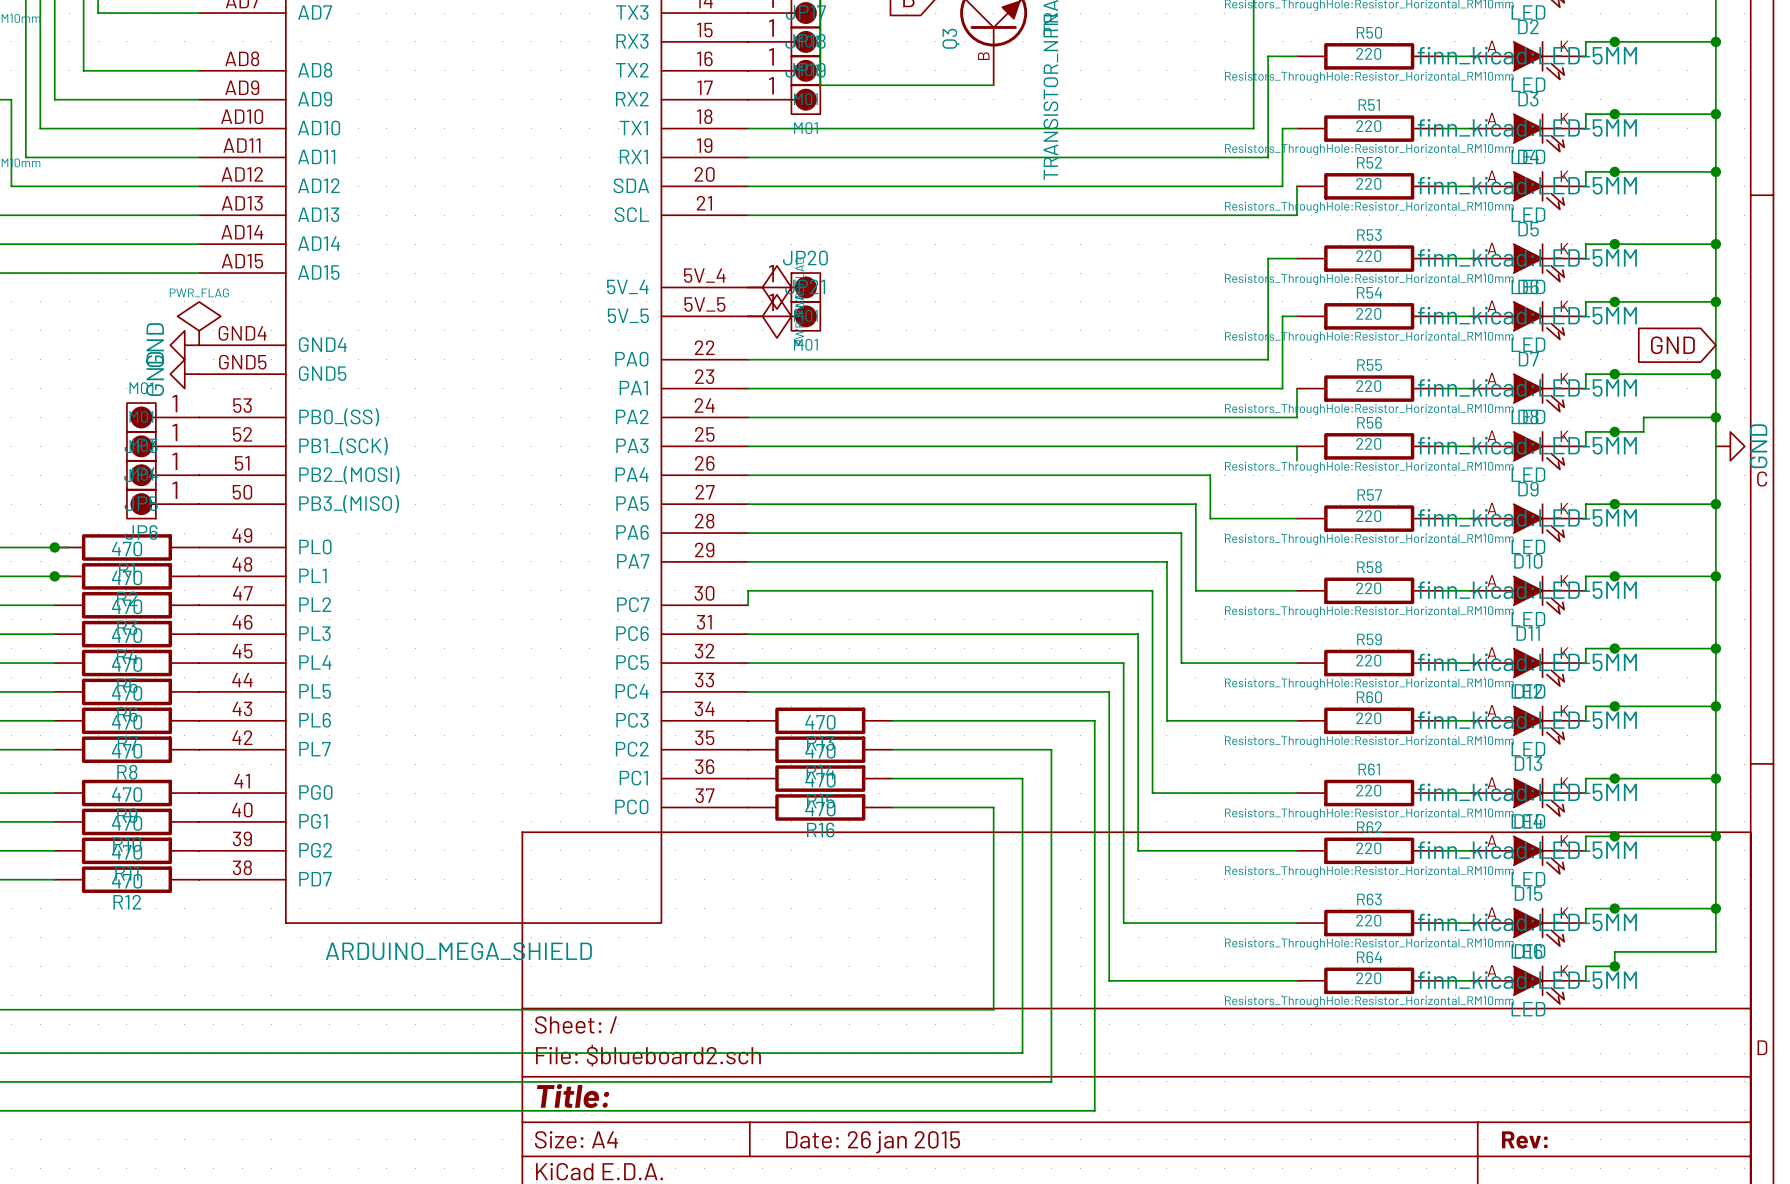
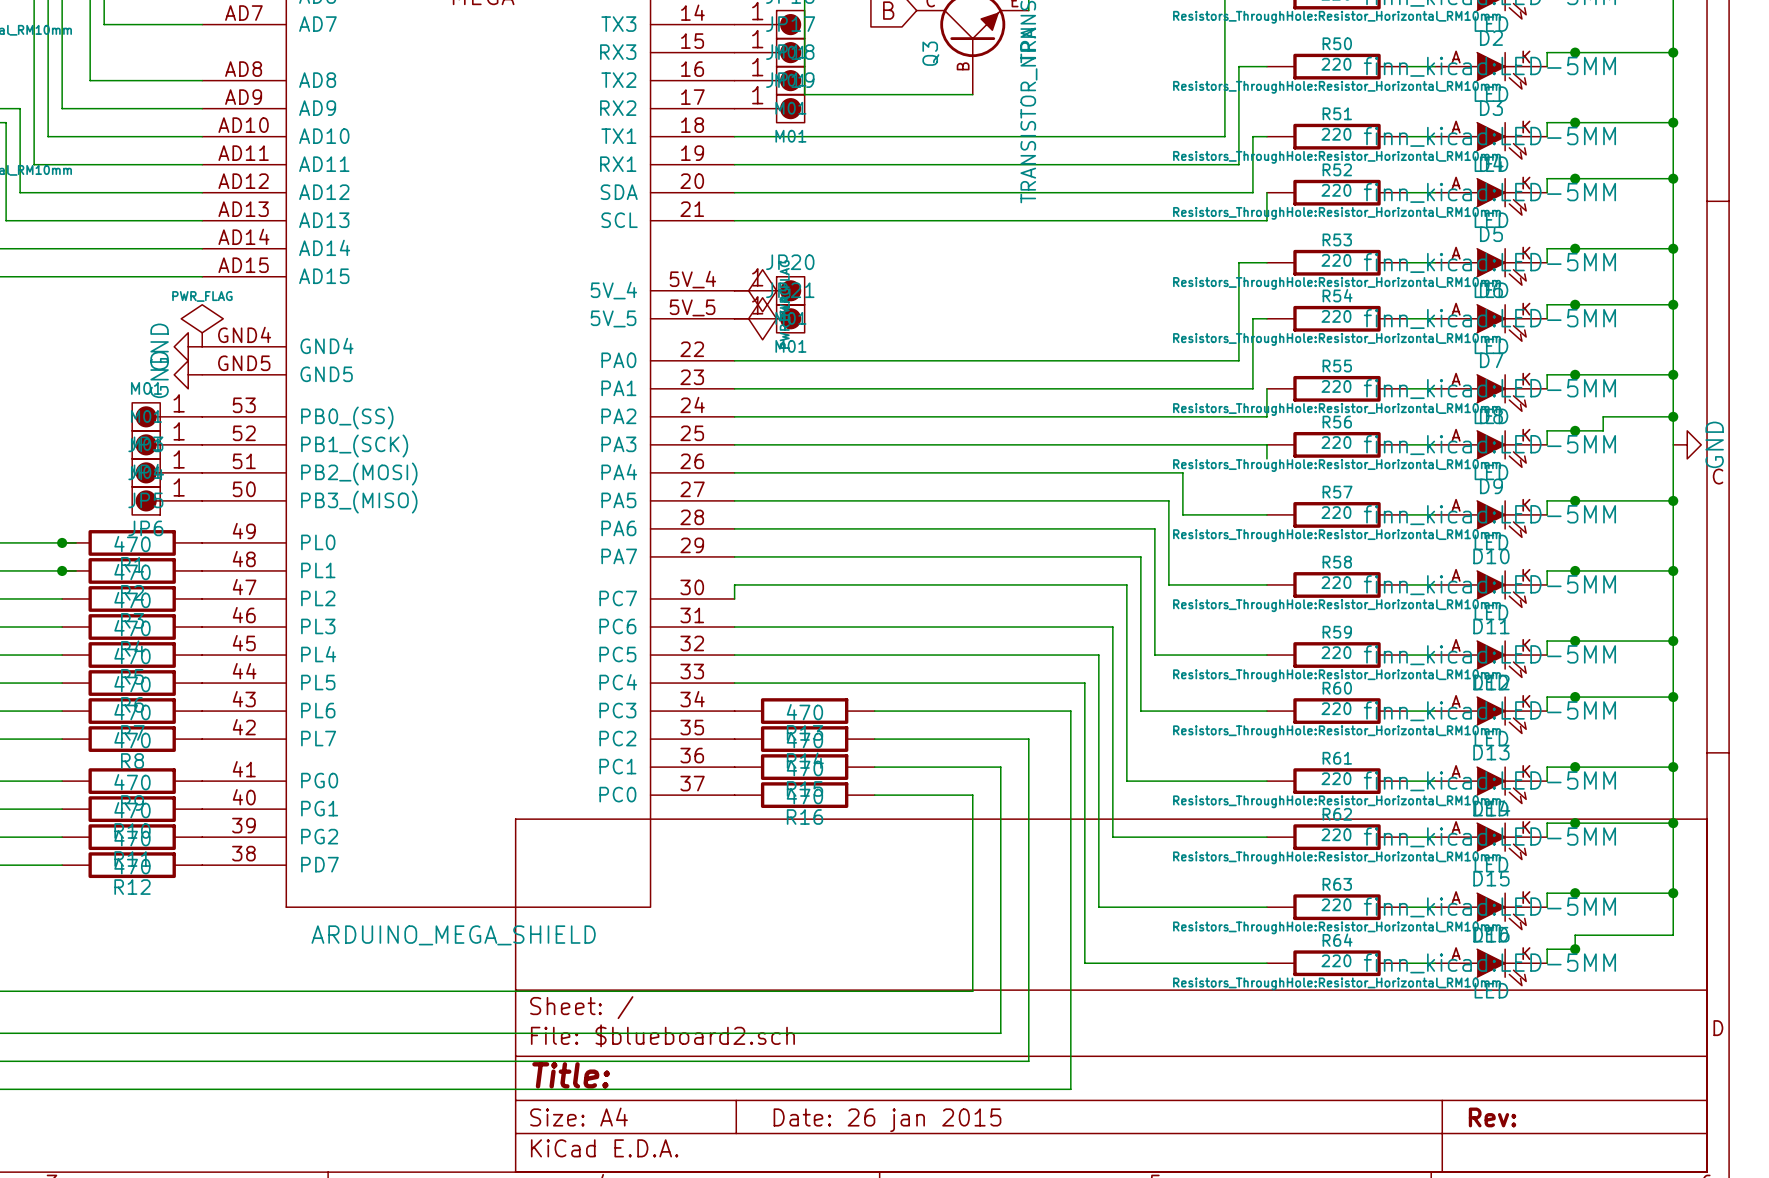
global label: GND (1672, 345) -> none

